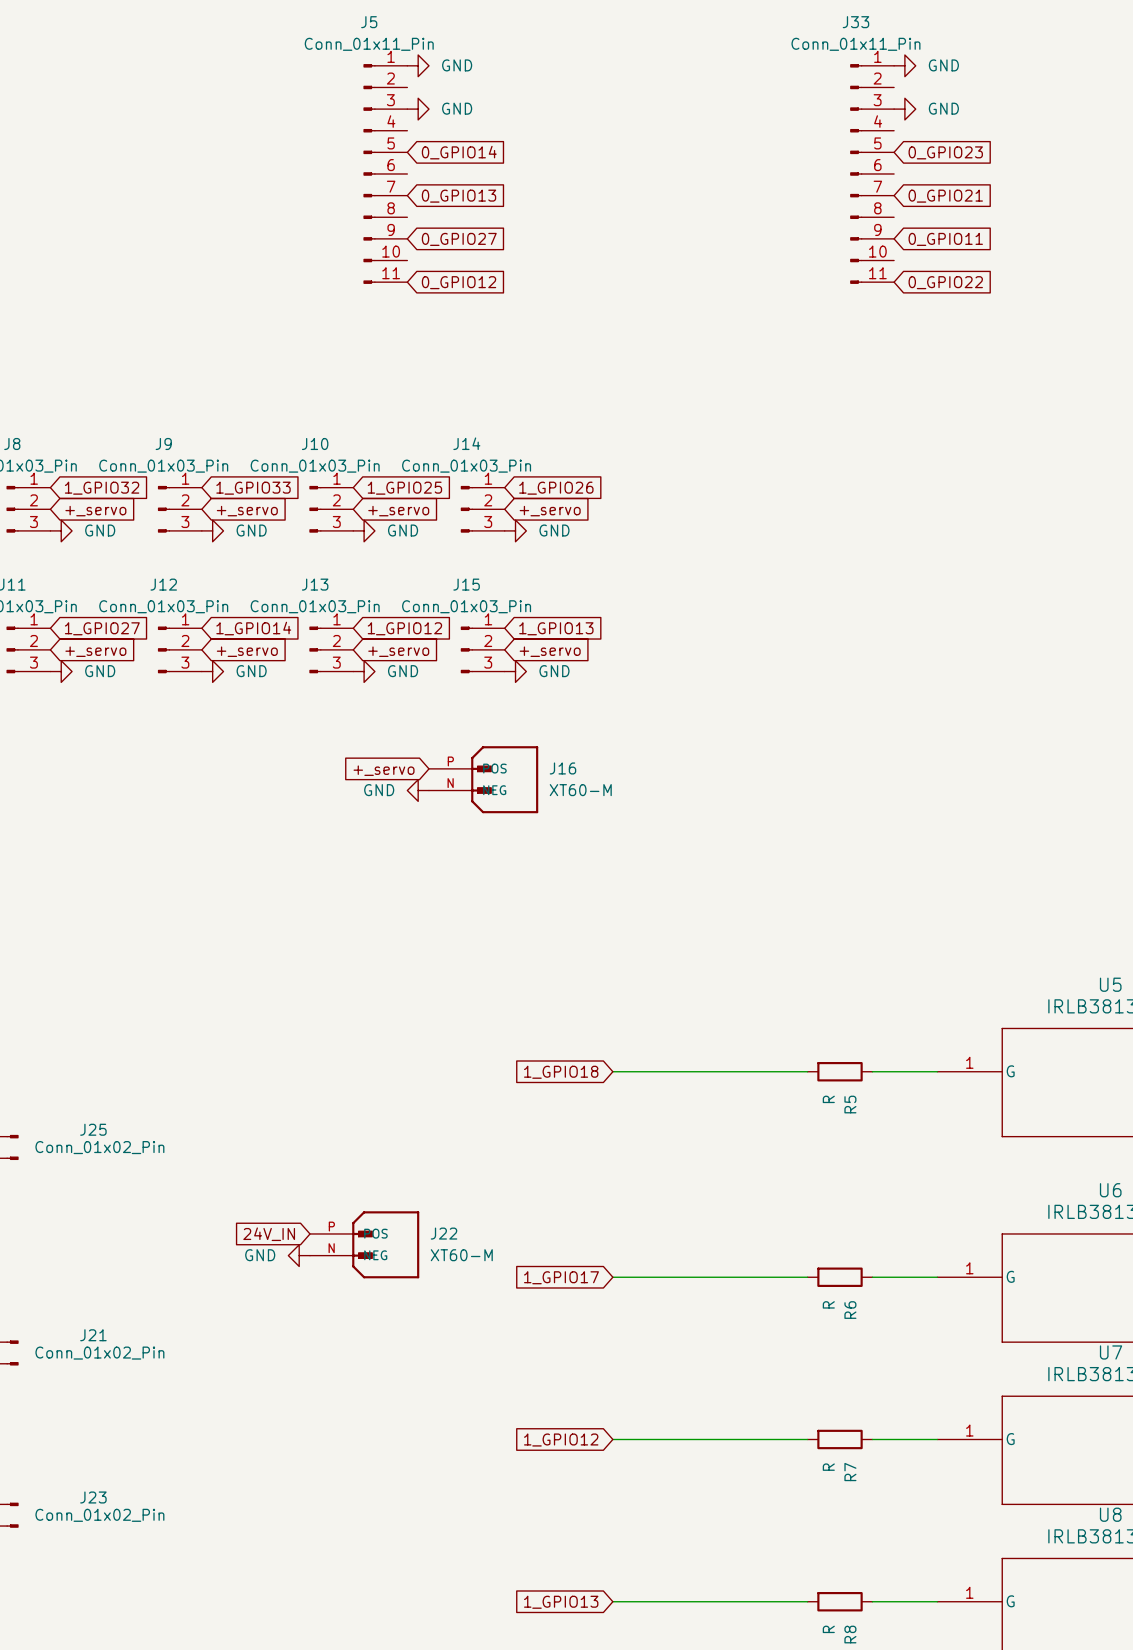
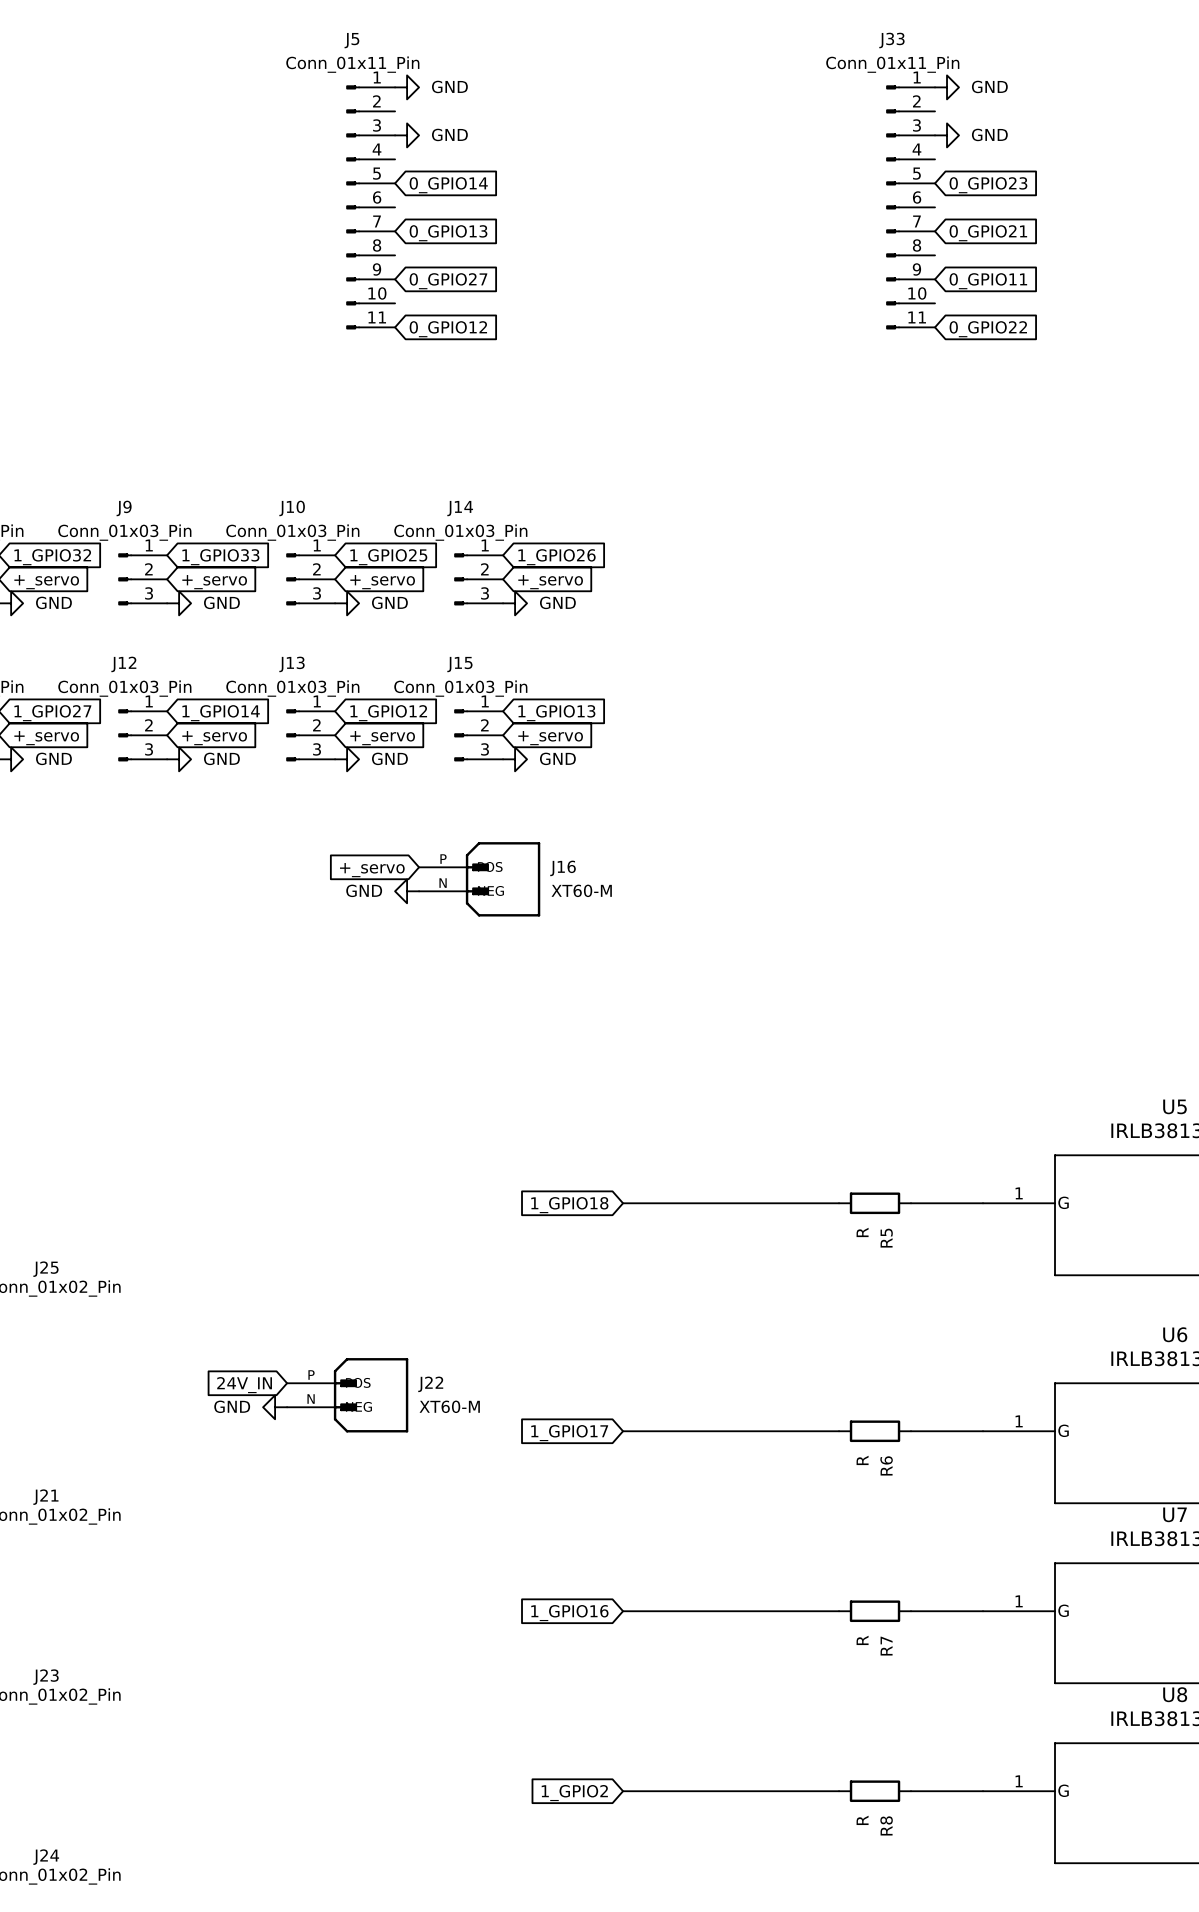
global label: 1_GPIO12 (561, 1440) -> 1_GPIO16 (569, 1613)
global label: 1_GPIO13 (561, 1602) -> 1_GPIO2 (574, 1793)

